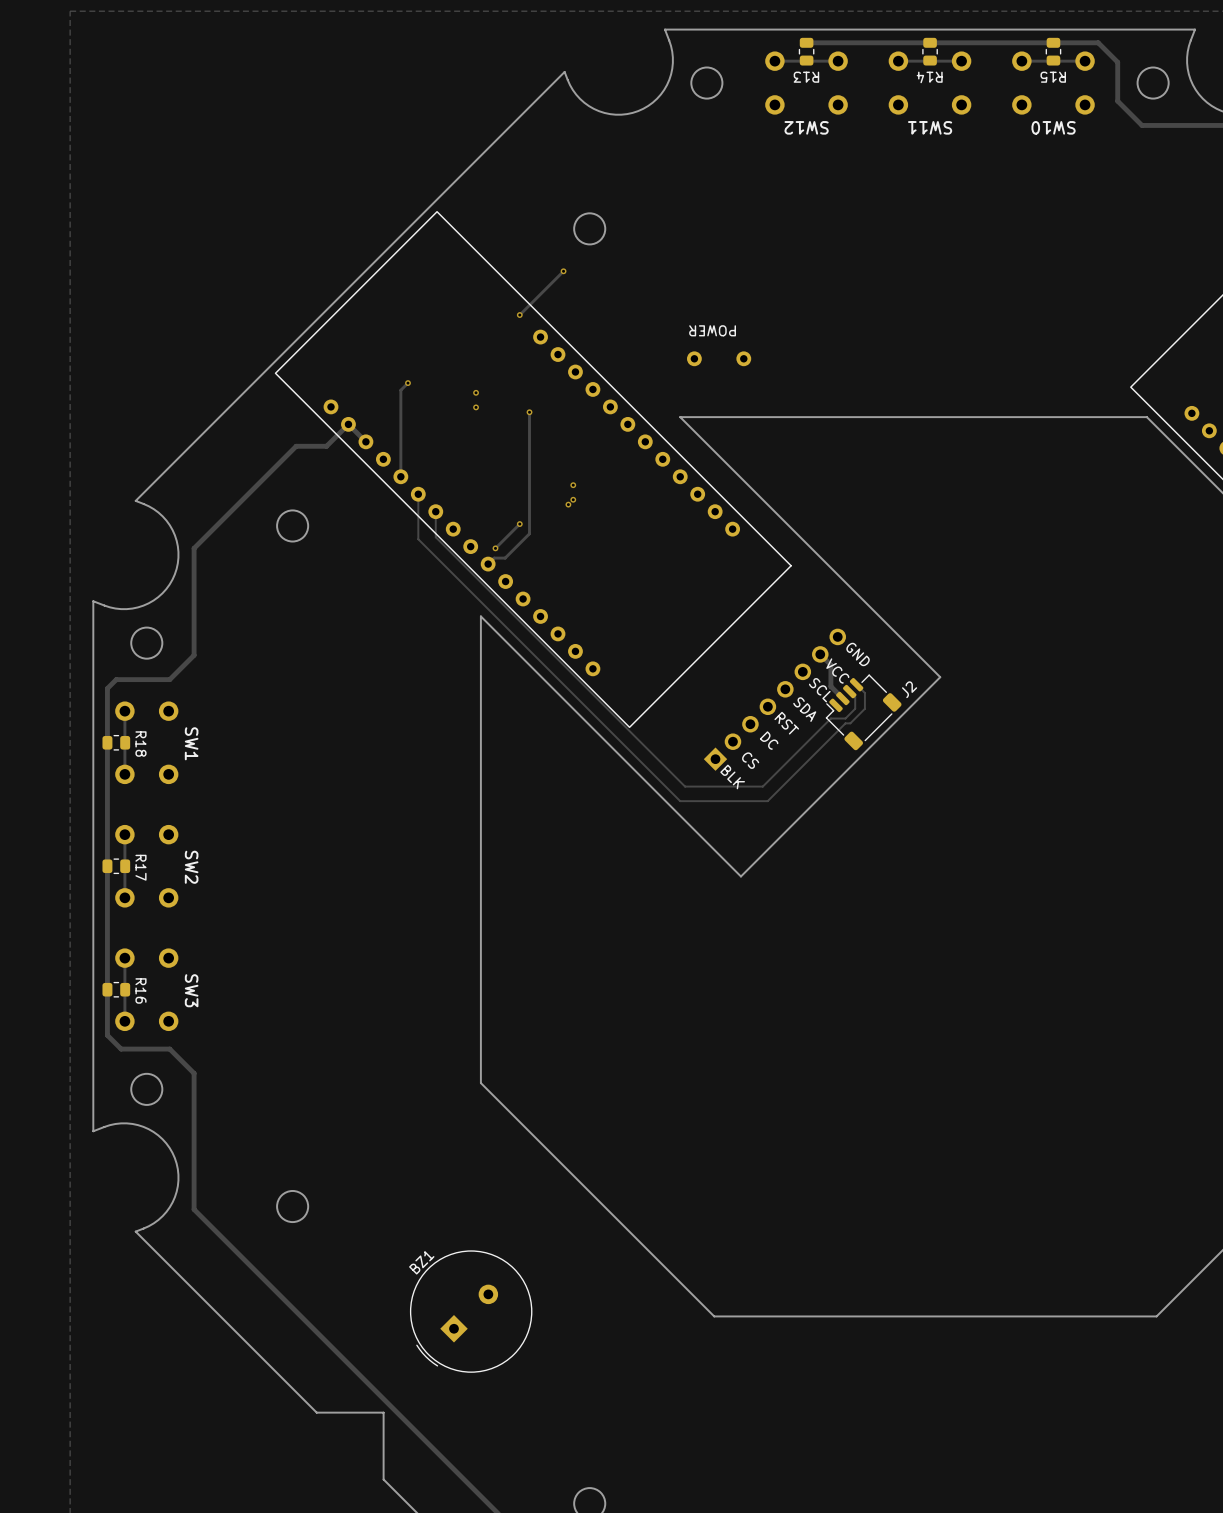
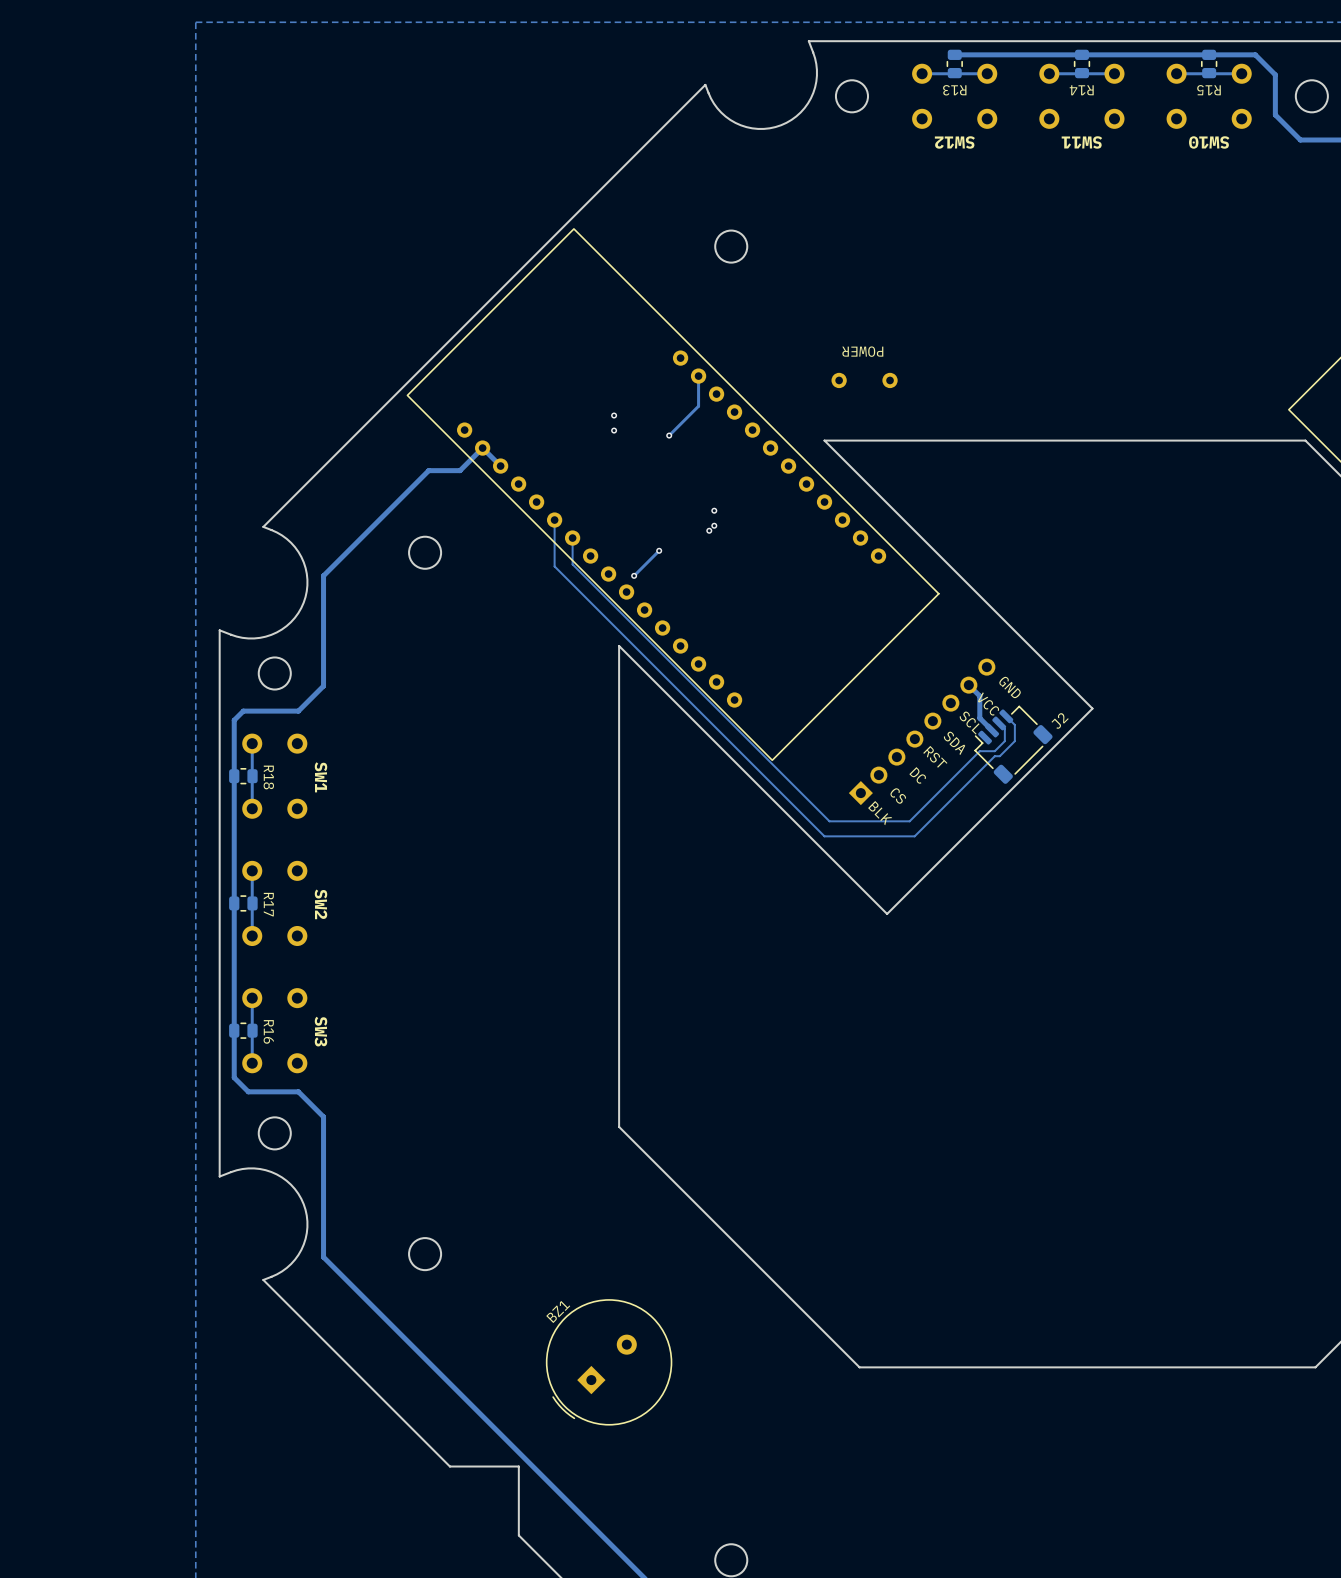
track: (563, 271) (519, 315) -> none
via: (563, 271) -> none
via: (519, 315) -> none
track: (407, 383) (400, 390) (400, 476) -> none
via: (407, 383) -> none
track: (529, 412) (529, 533) (505, 558) (494, 558) (488, 564) -> (669, 435) (698, 406) (698, 376)

